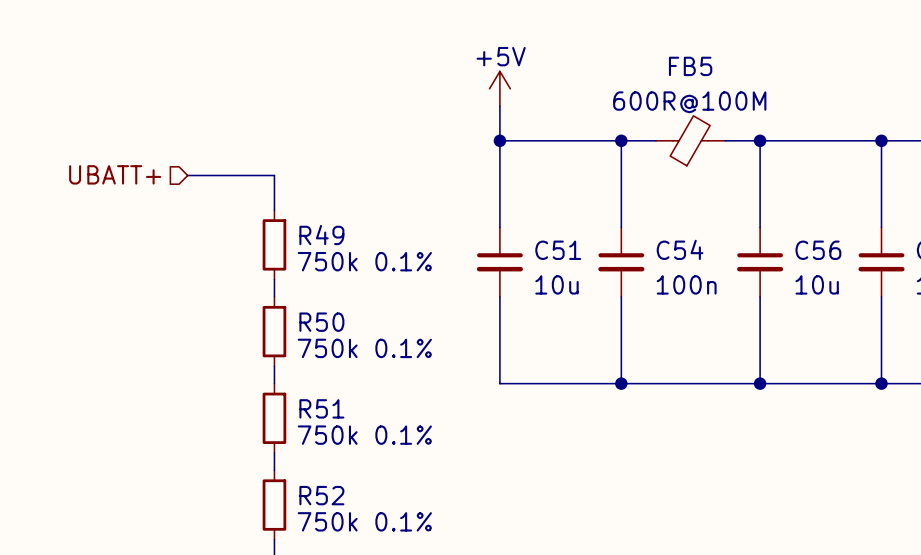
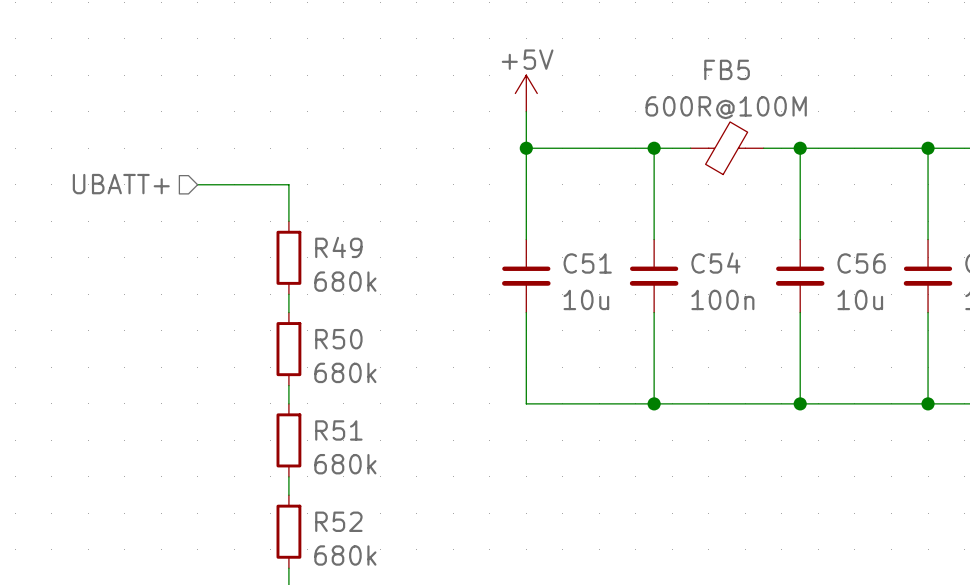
R49 value: 750k 0.1% (364, 261) -> 680k (345, 281)
R50 value: 750k 0.1% (364, 348) -> 680k (345, 372)
R51 value: 750k 0.1% (364, 435) -> 680k (345, 464)
R52 value: 750k 0.1% (364, 521) -> 680k (345, 555)

